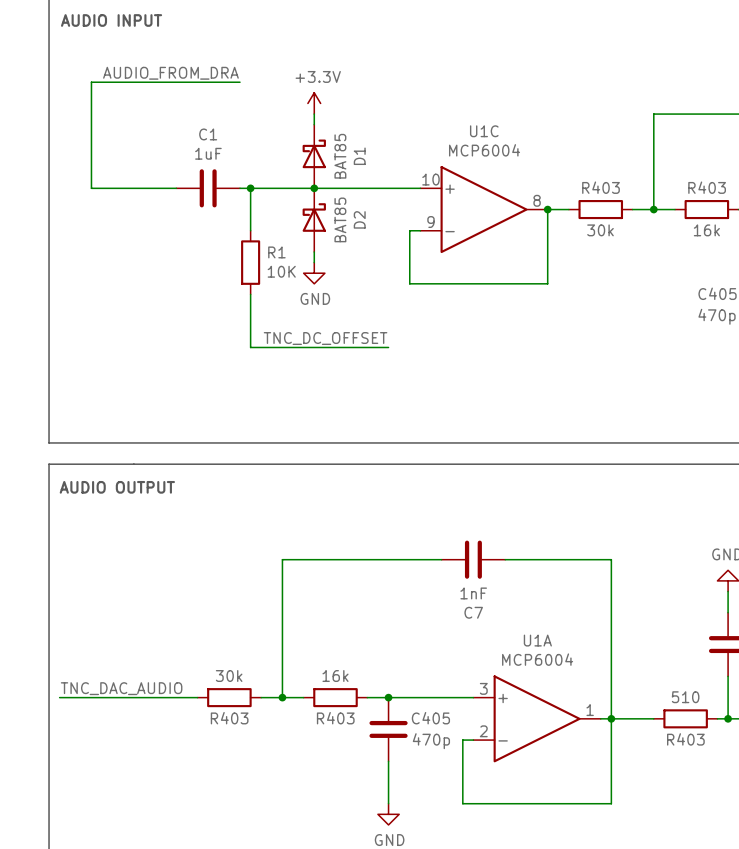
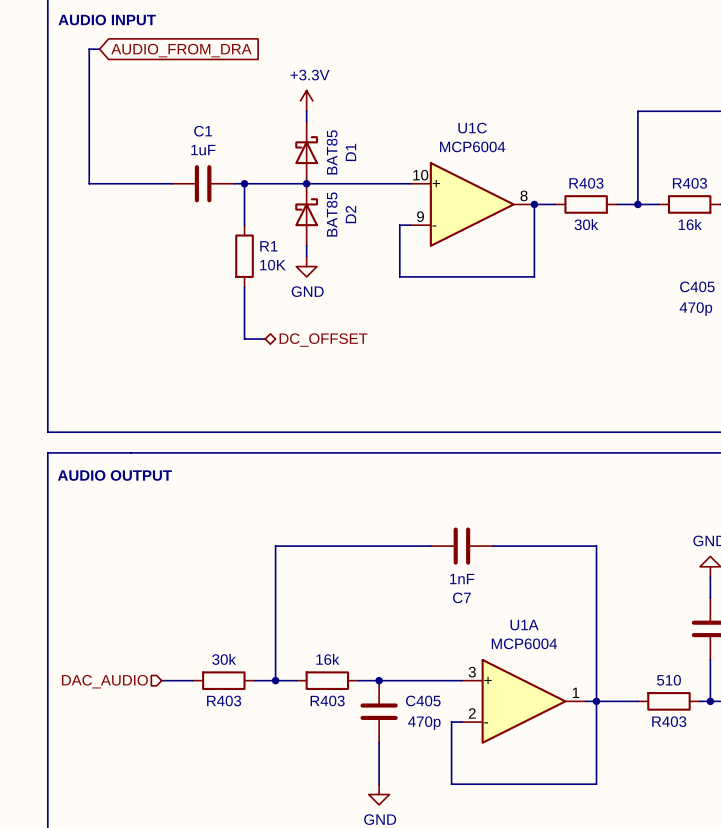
global label: none -> AUDIO_FROM_DRA (181, 50)
label: AUDIO_FROM_DRA (170, 73) -> none
wire: (91, 82) (240, 82) -> (89, 80) (89, 49) (99, 49)
label: TNC_DC_OFFSET (325, 338) -> none
wire: (271, 347) (388, 347) -> none
hierarchical label: none -> DC_OFFSET (323, 340)
label: TNC_DAC_AUDIO (121, 688) -> none
wire: (59, 697) (165, 697) -> none
hierarchical label: none -> DAC_AUDIO (104, 681)

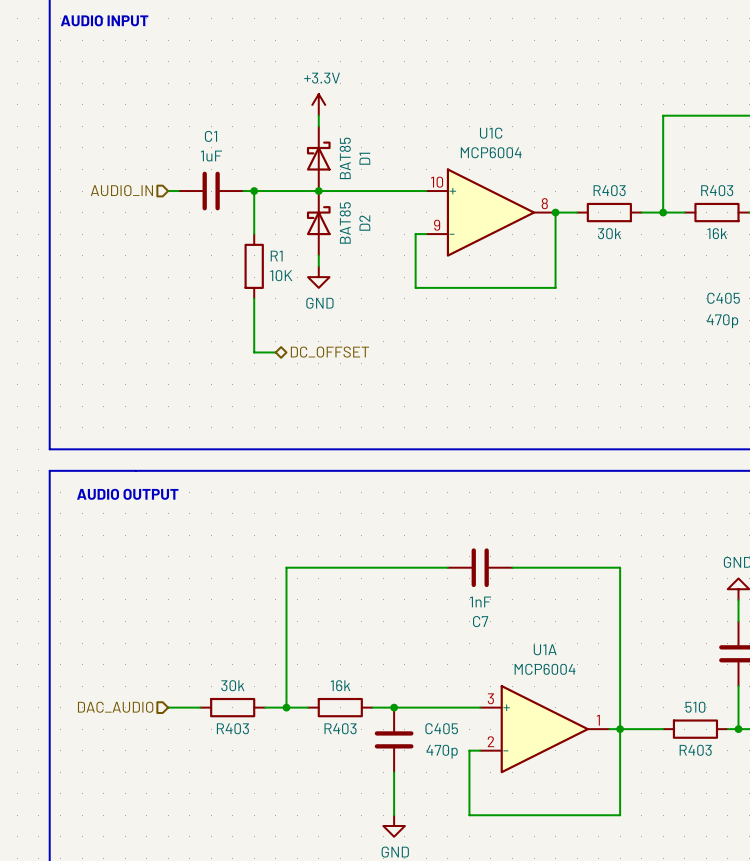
wire: (99, 49) (89, 49) (89, 183) (161, 183) -> none
global label: AUDIO_FROM_DRA (181, 50) -> none
hierarchical label: none -> AUDIO_IN (121, 190)

